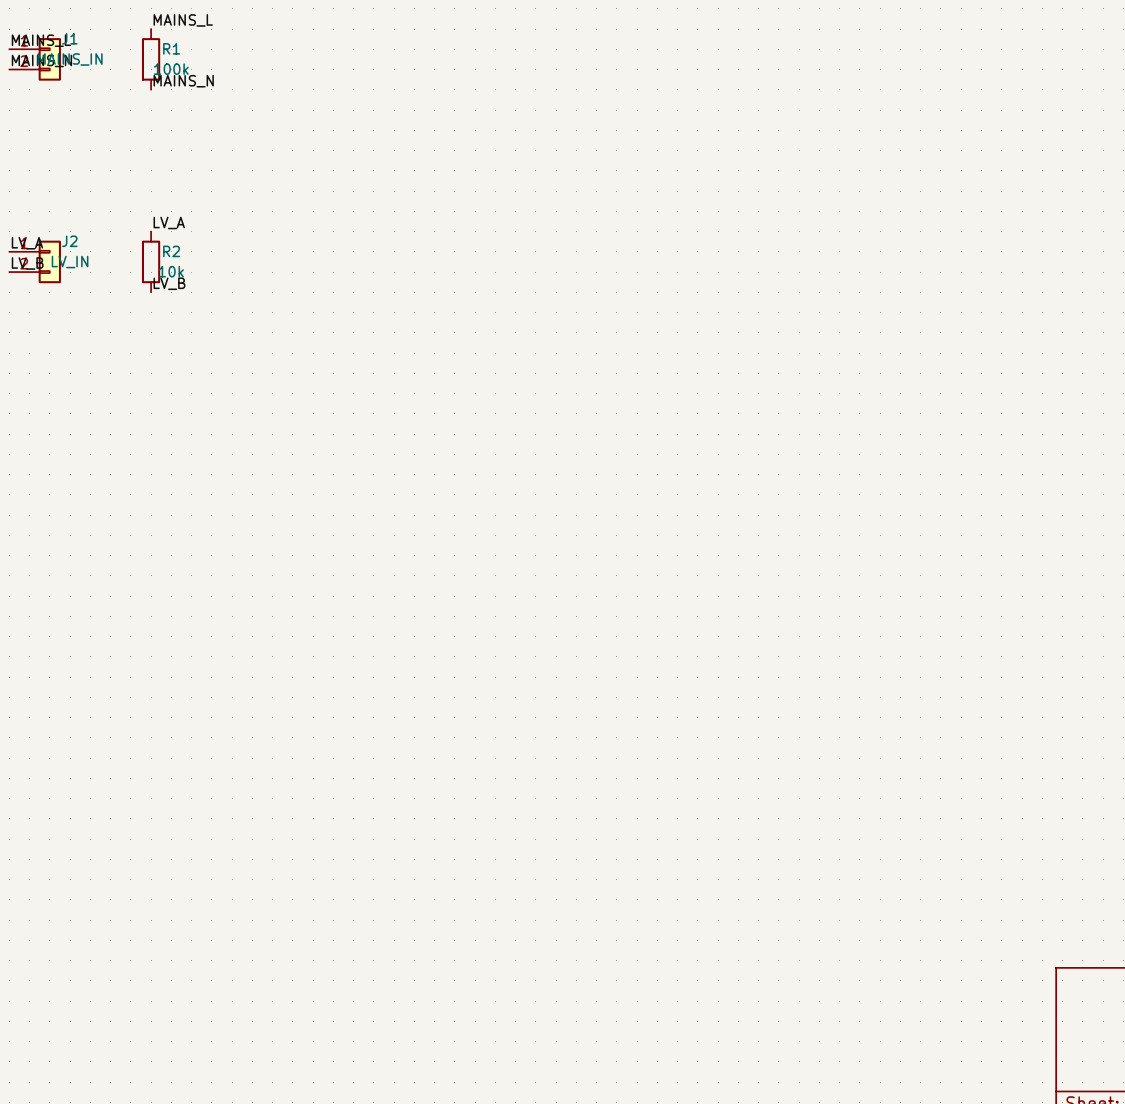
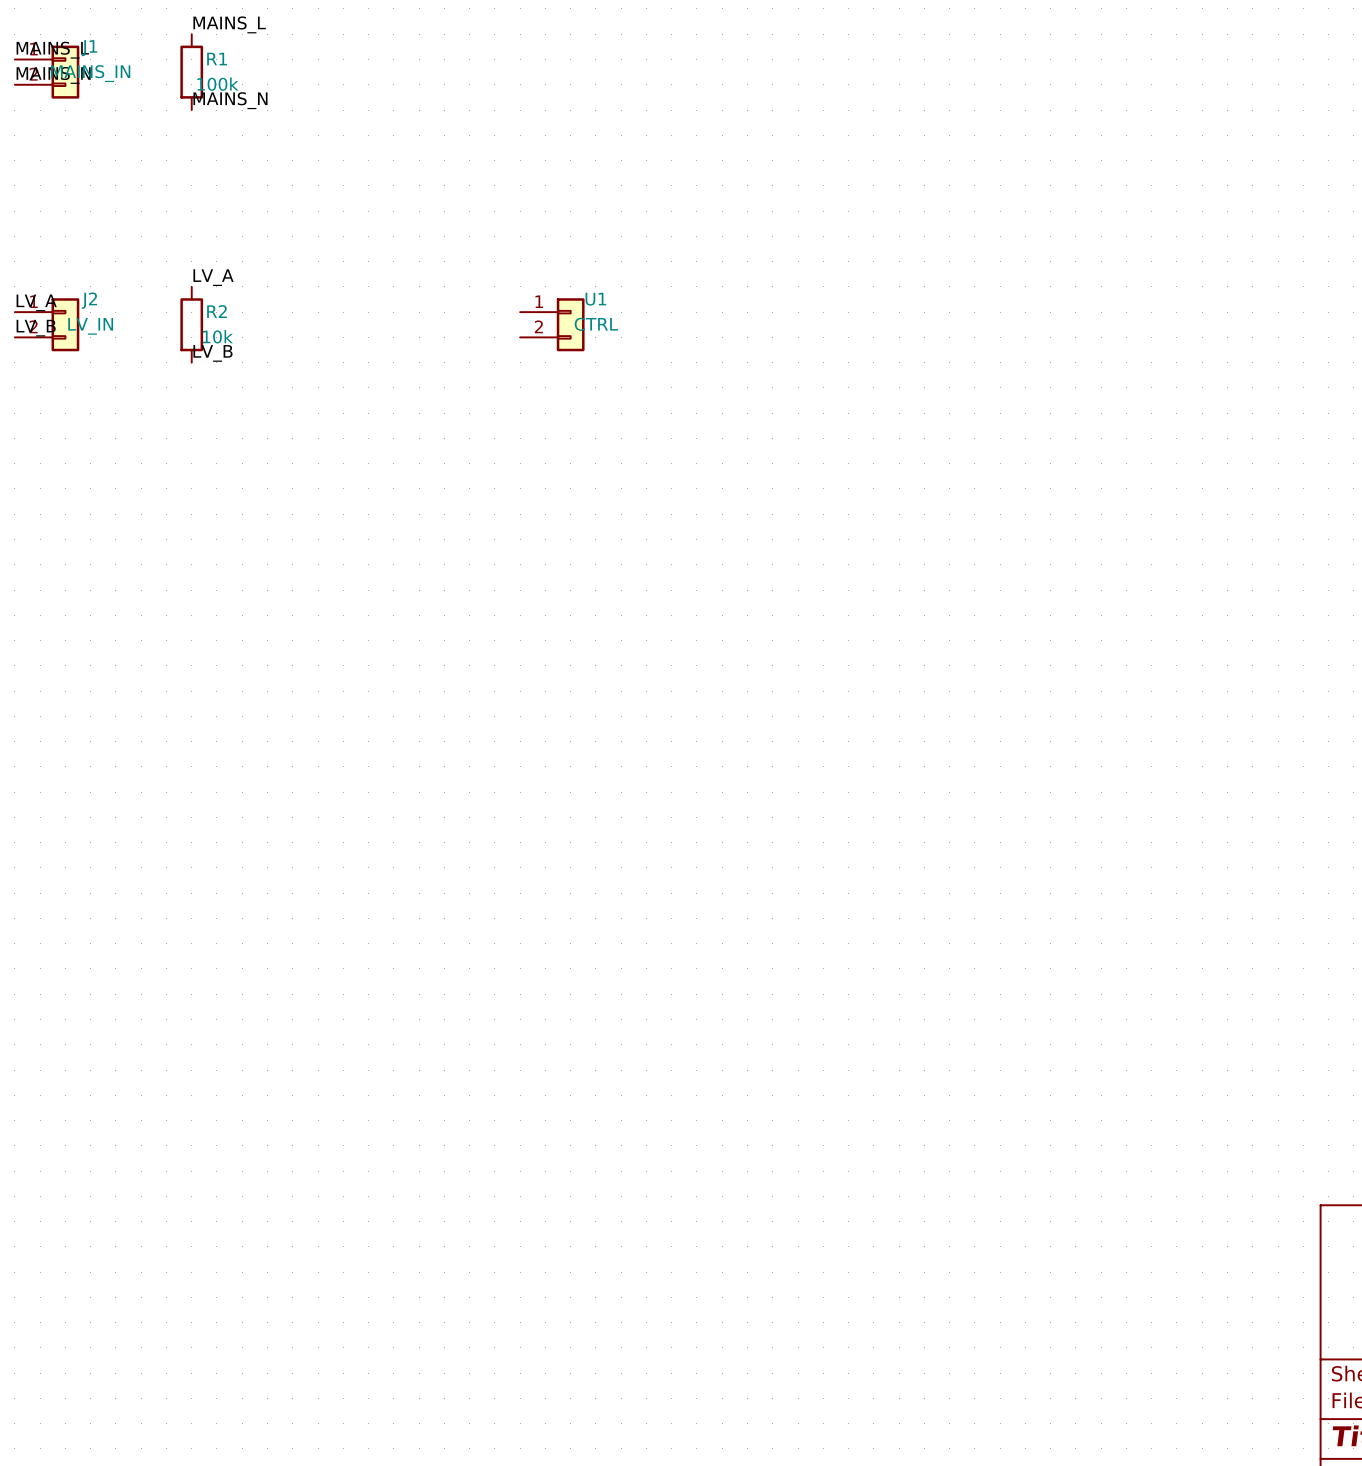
U1: none -> CTRL (552, 324)

